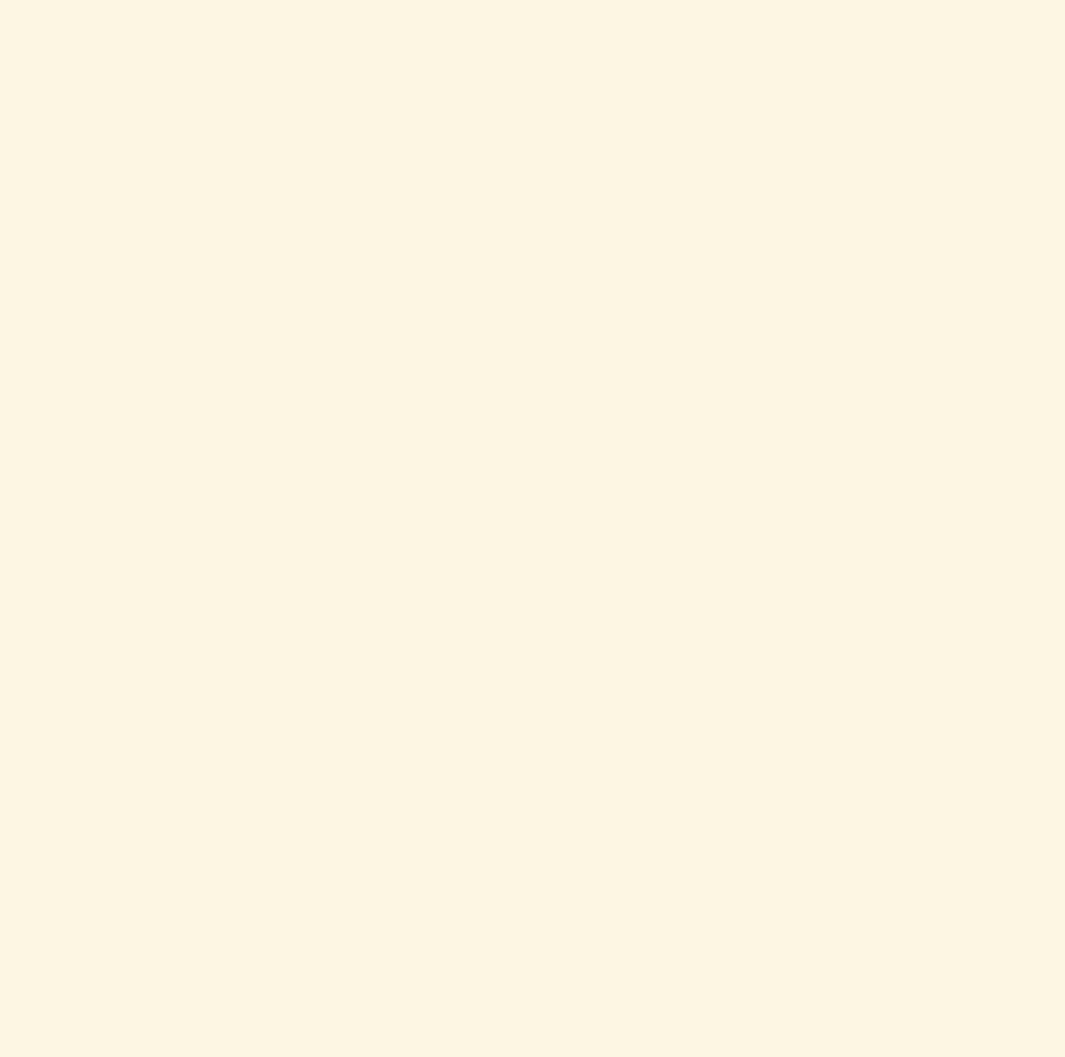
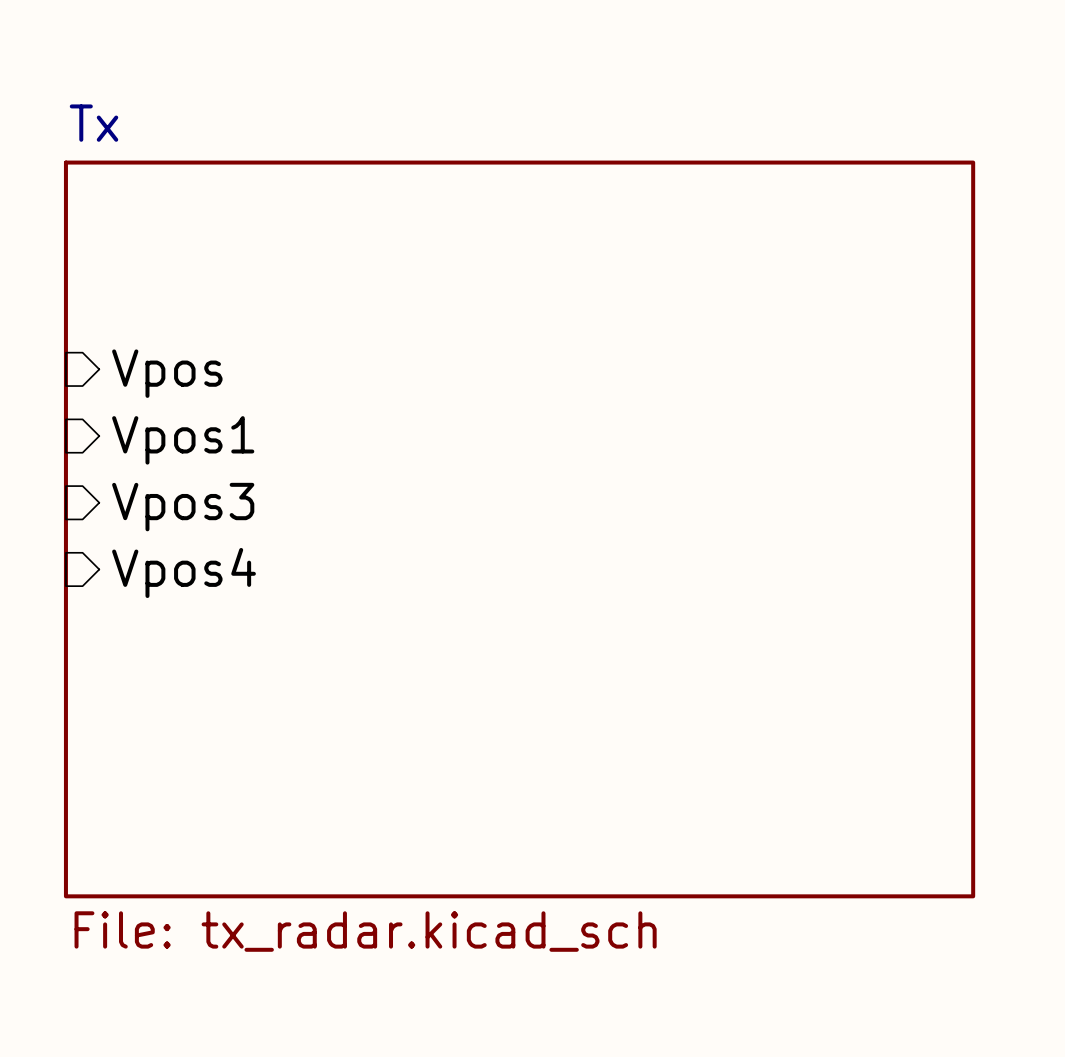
sheet pin: none -> Vpos (167, 373)
sheet pin: none -> Vpos1 (183, 440)
sheet pin: none -> Vpos3 (183, 507)
sheet Tx: none -> File: tx_radar.kicad_sch (519, 529)
sheet pin: none -> Vpos4 (184, 572)

